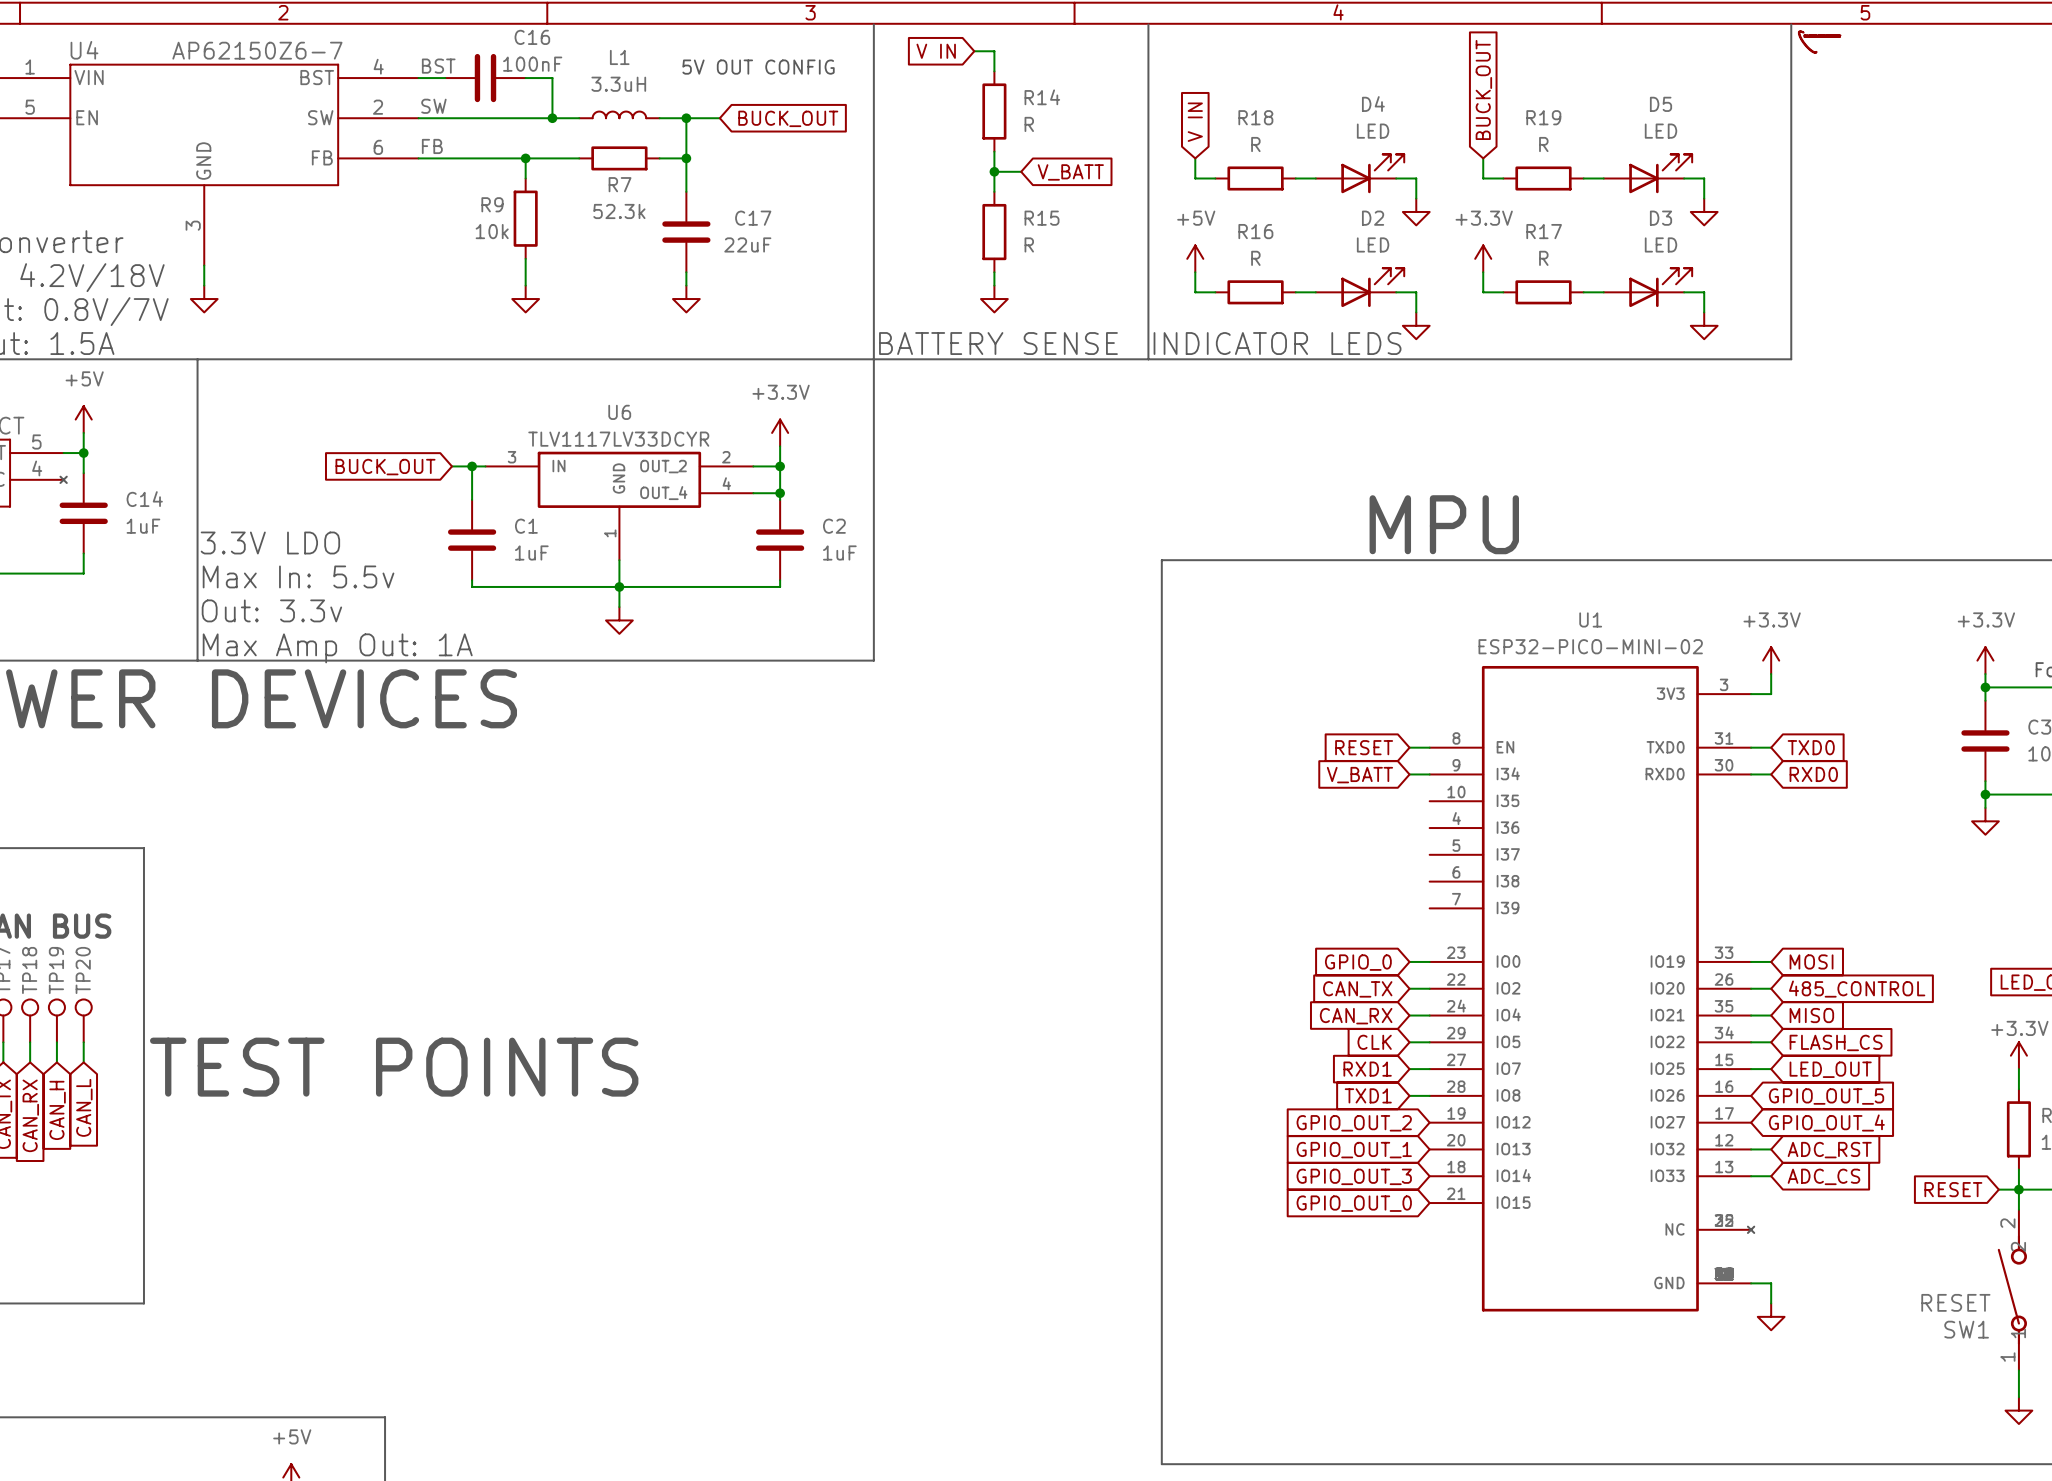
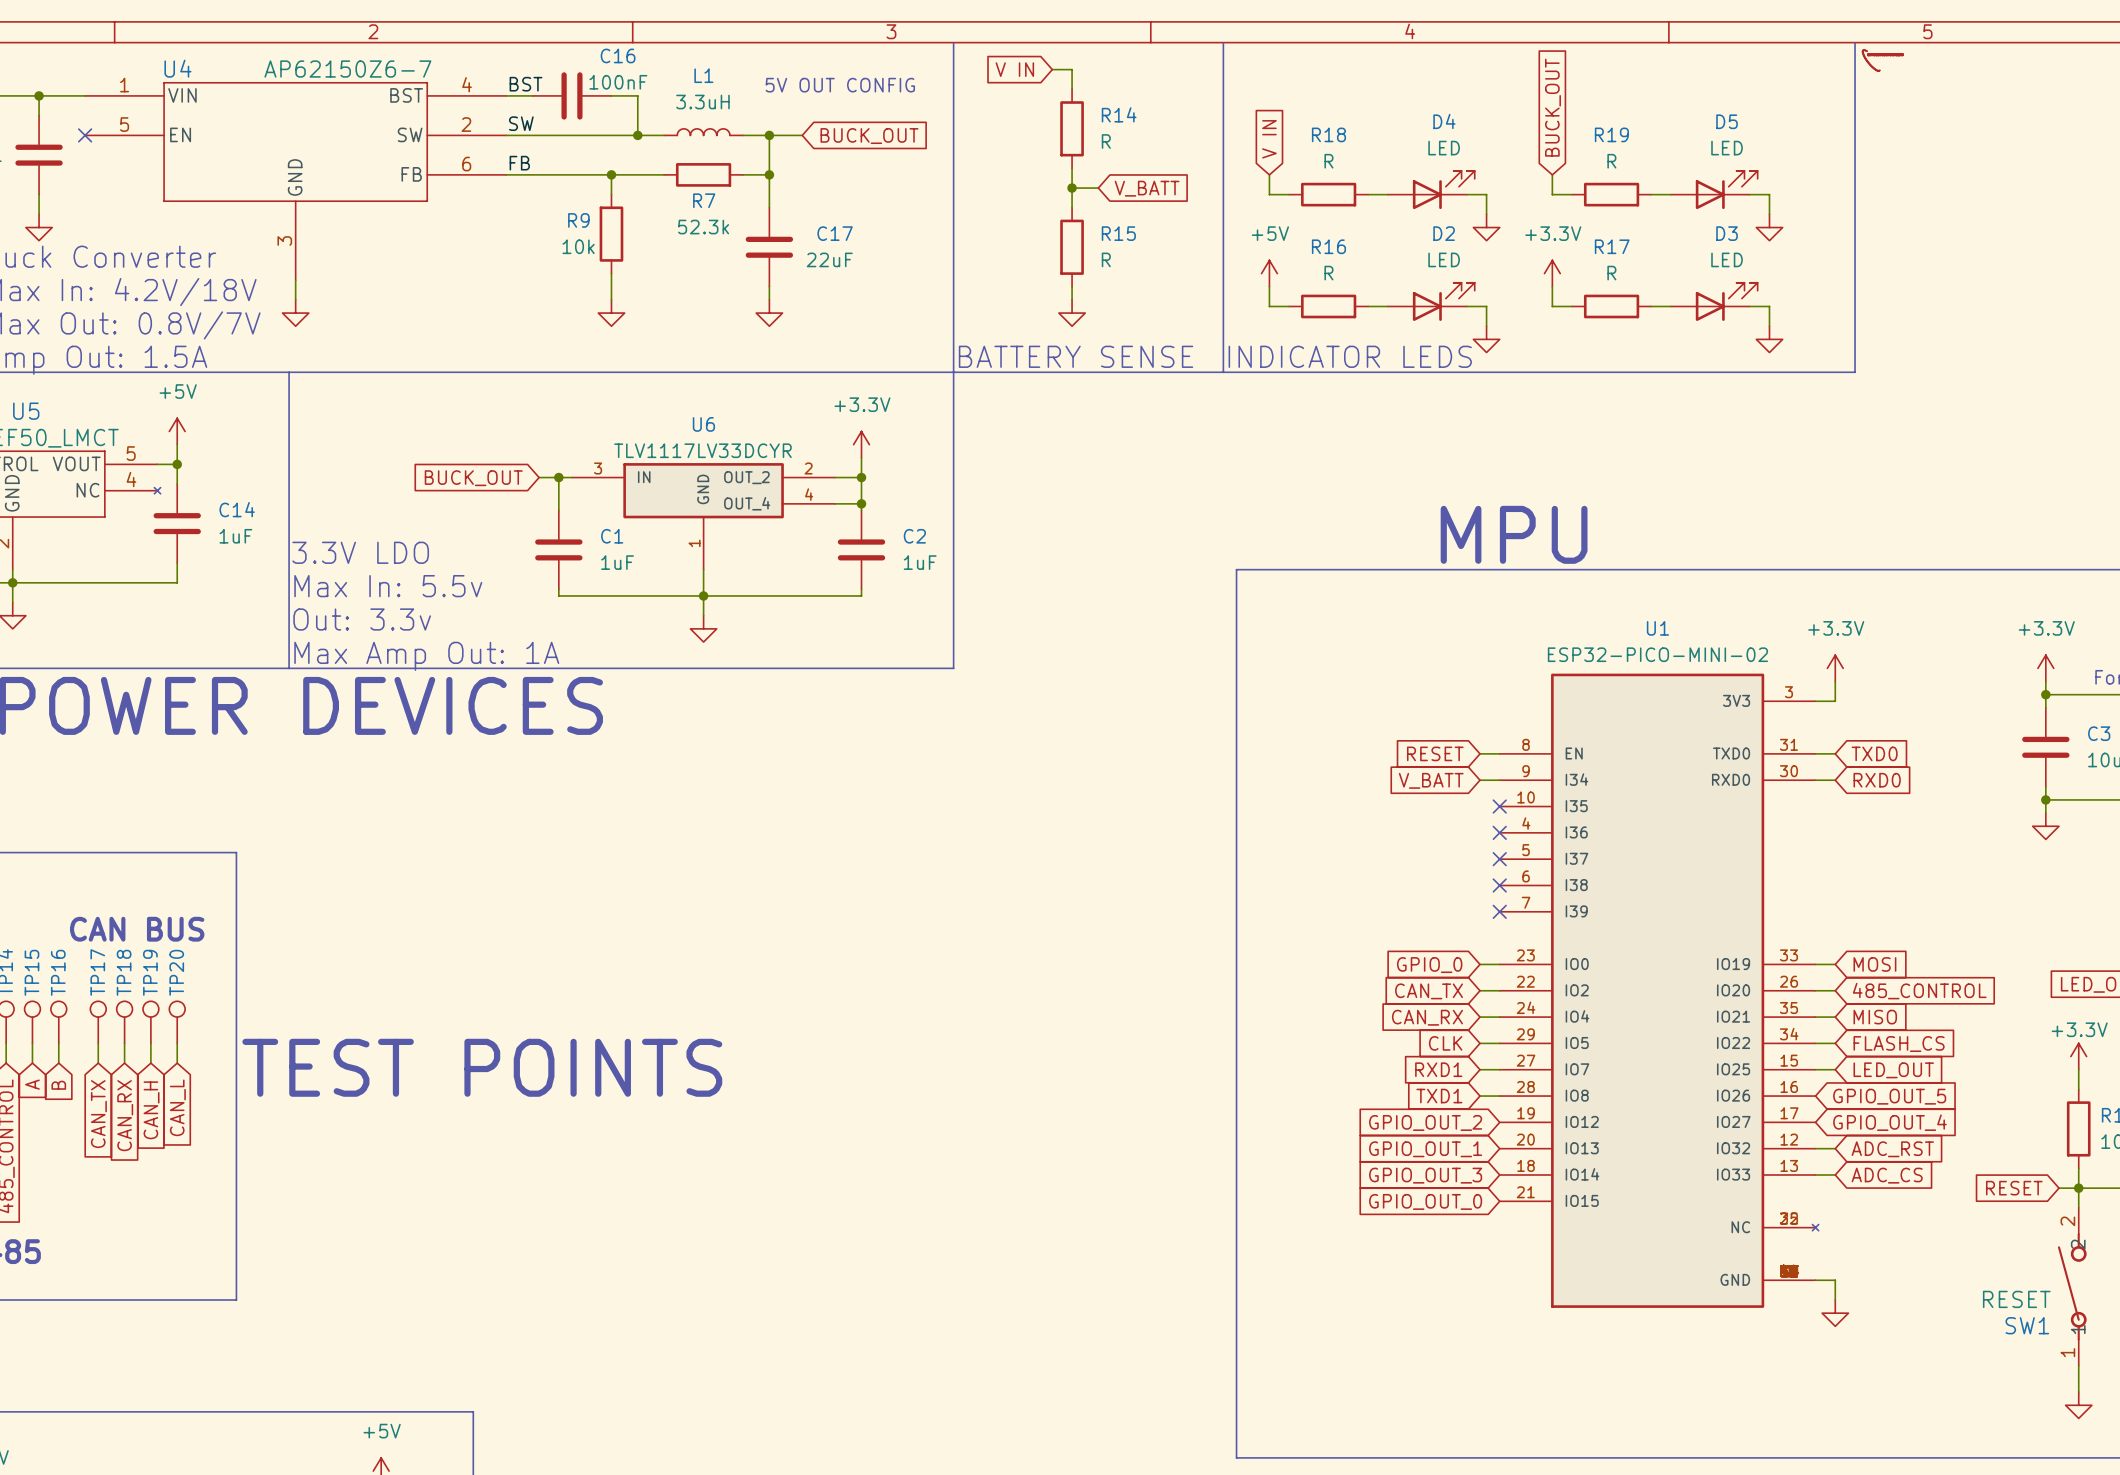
no-connect mark: none -> (1499, 806)
no-connect mark: none -> (1499, 832)
no-connect mark: none -> (1499, 859)
no-connect mark: none -> (1499, 885)
no-connect mark: none -> (1499, 911)

